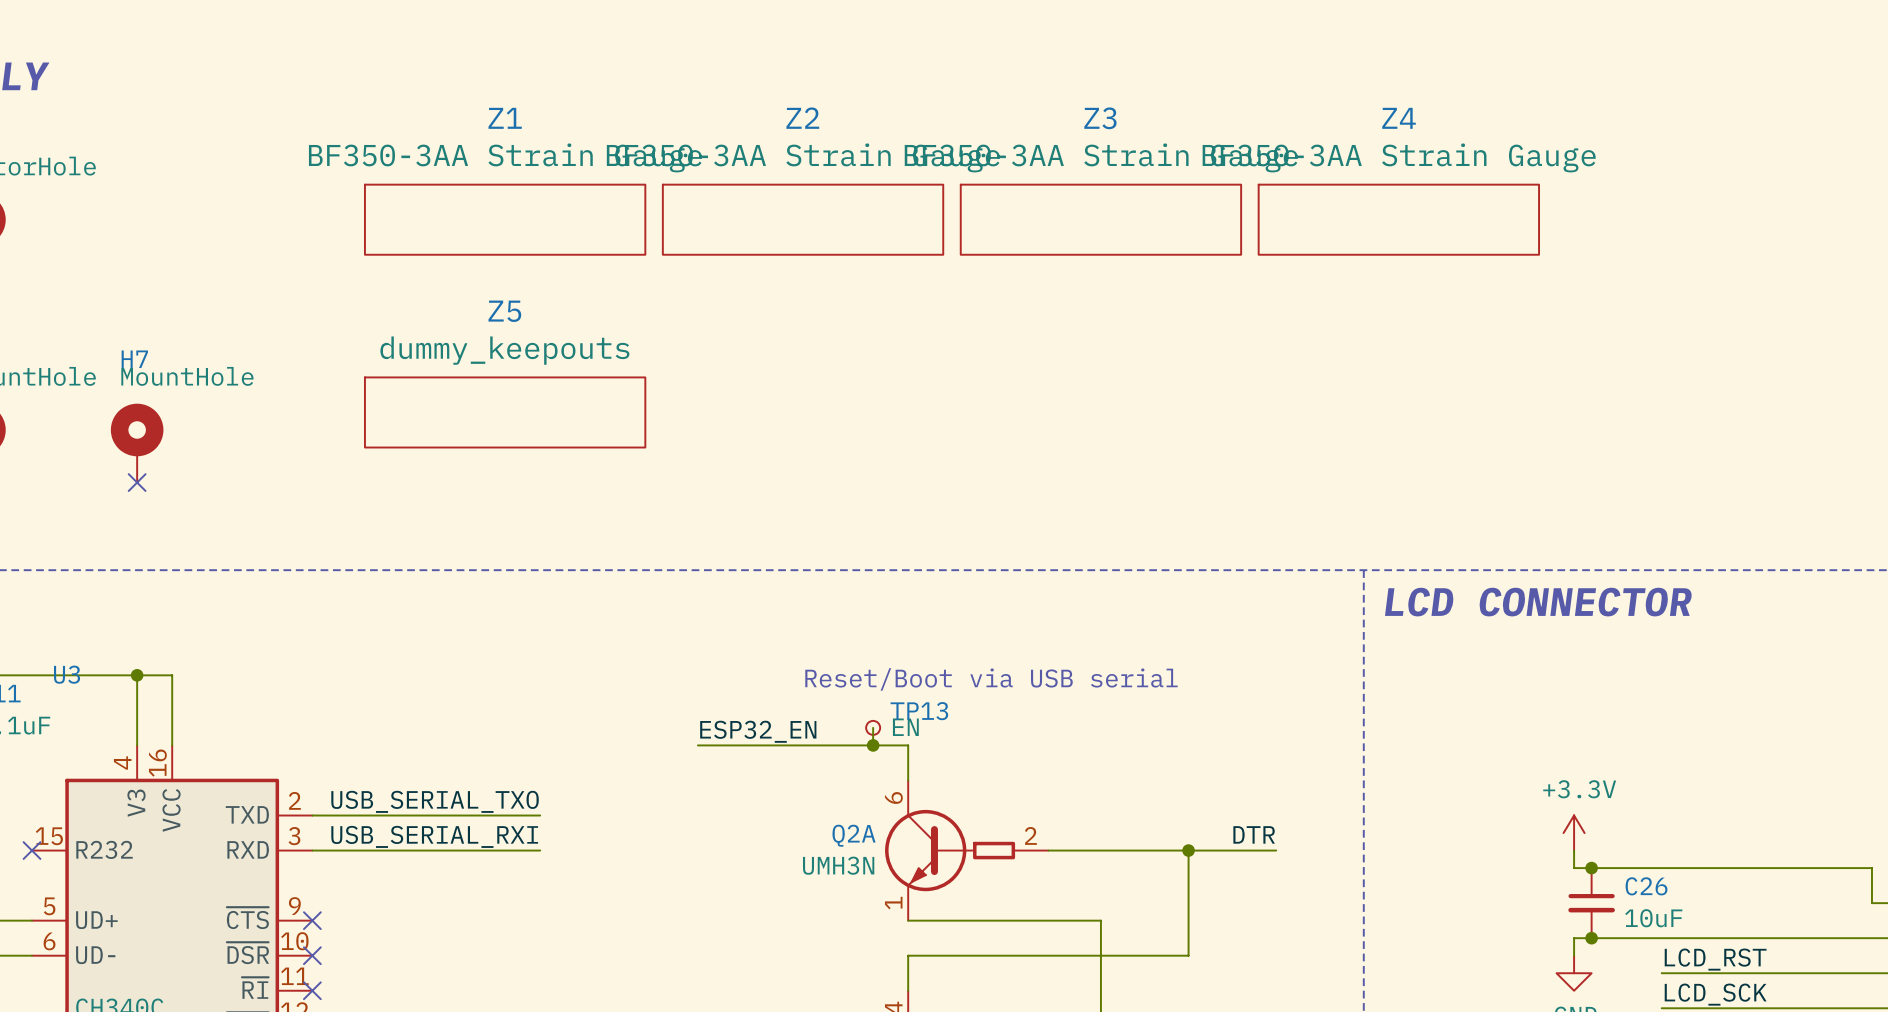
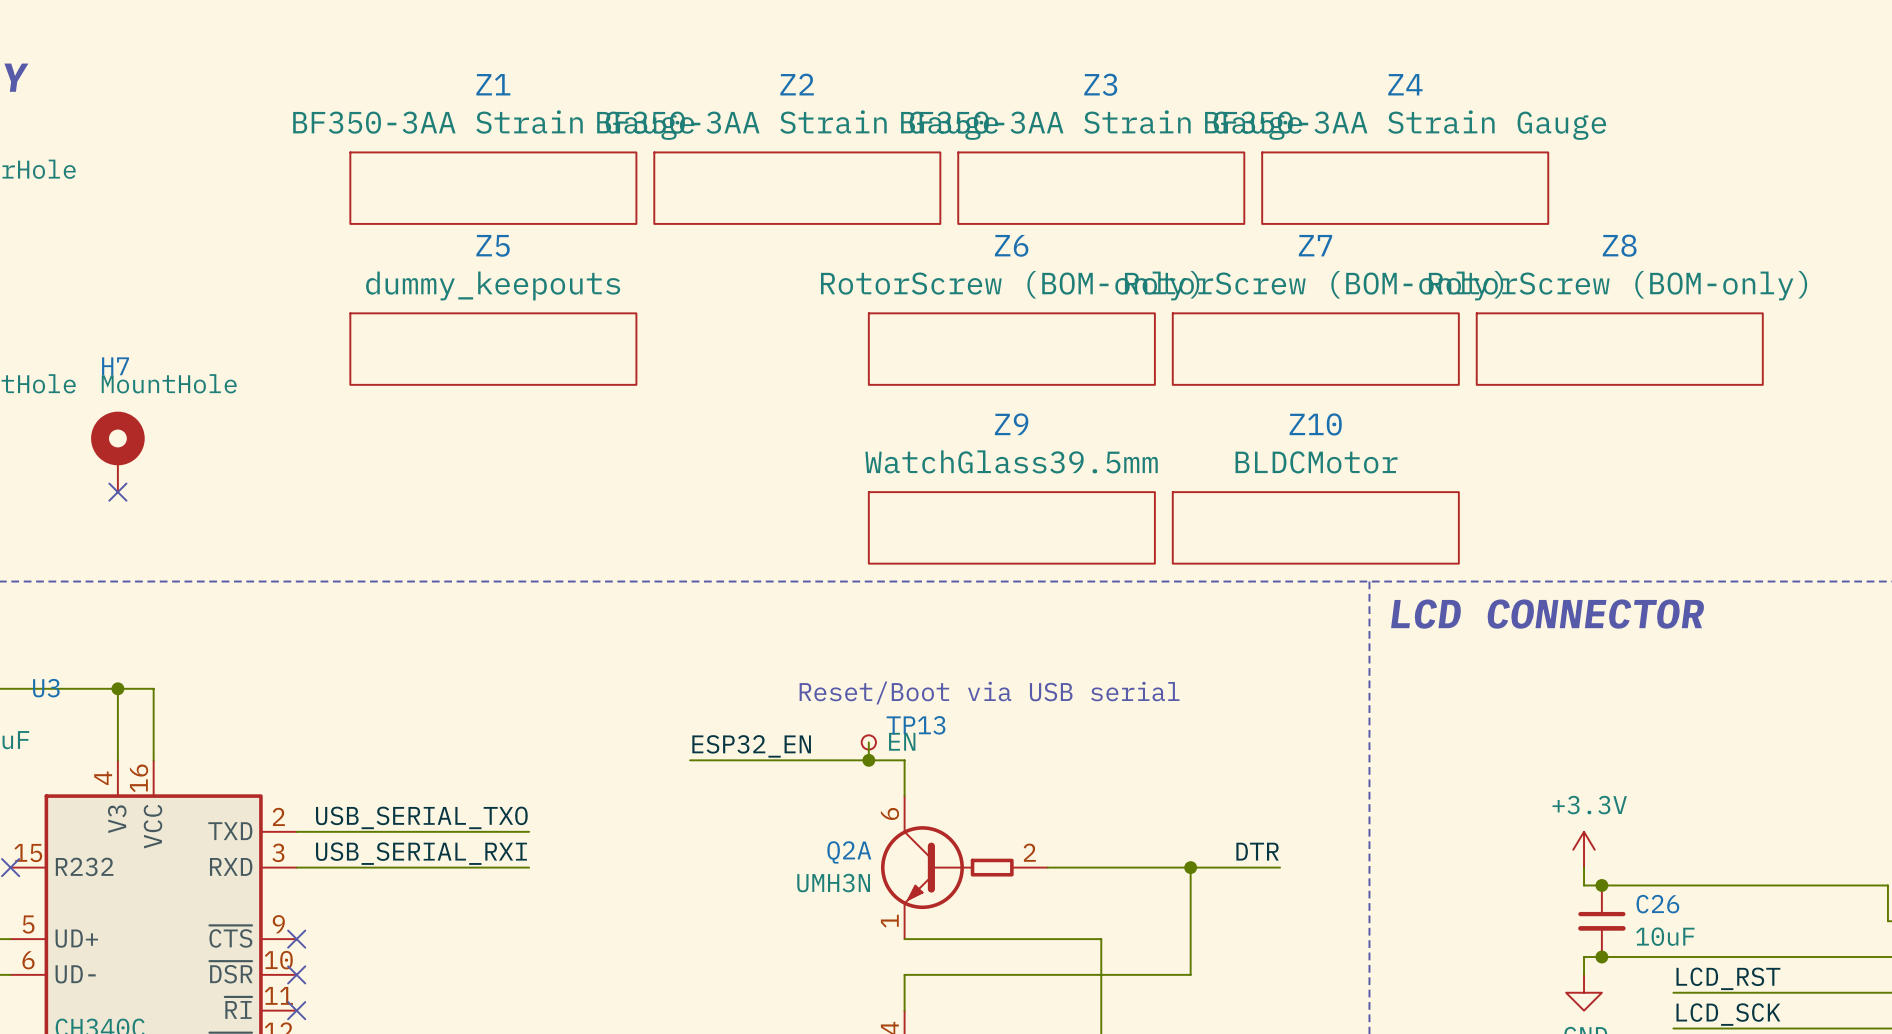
Z1 position: (505, 219) -> (493, 188)
Z2 position: (803, 219) -> (797, 188)
Z3 position: (1100, 219) -> (1101, 188)
Z4 position: (1398, 219) -> (1405, 188)
Z6: none -> RotorScrew (BOM-only) (1011, 349)
Z7: none -> RotorScrew (BOM-only) (1315, 349)
Z8: none -> RotorScrew (BOM-only) (1619, 349)
Z5 position: (505, 412) -> (493, 349)
Z9: none -> WatchGlass39.5mm (1011, 527)
Z10: none -> BLDCMotor (1315, 527)

